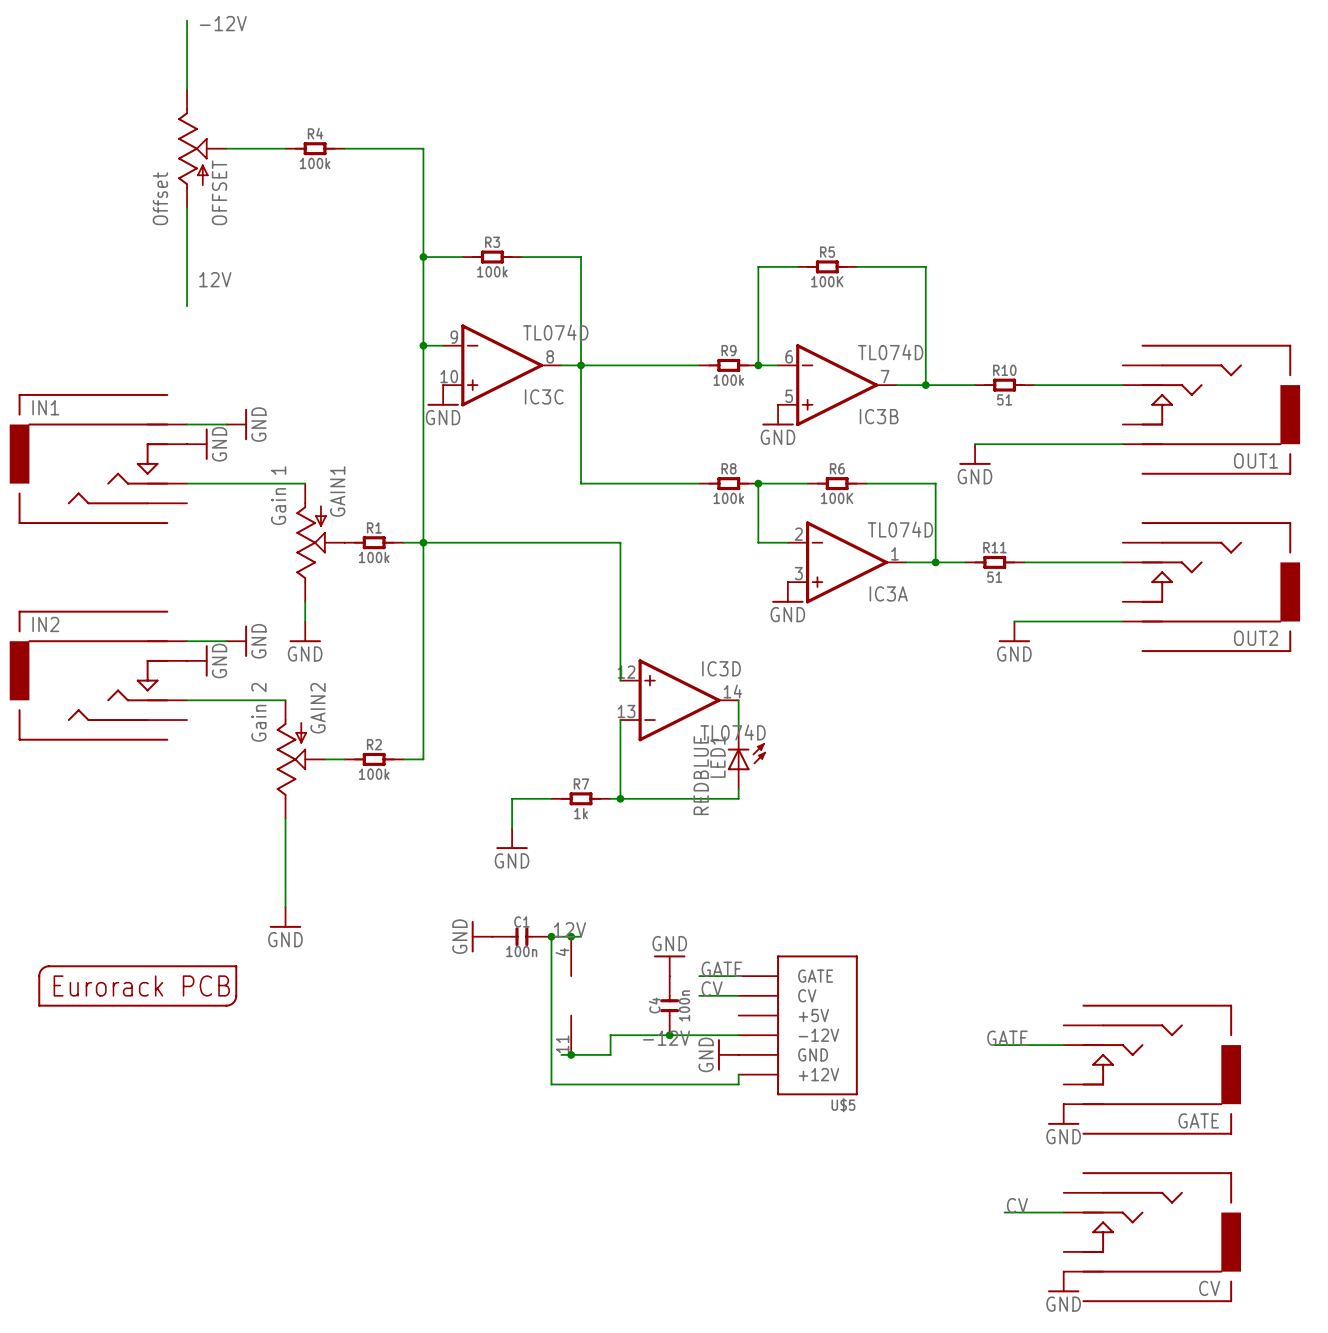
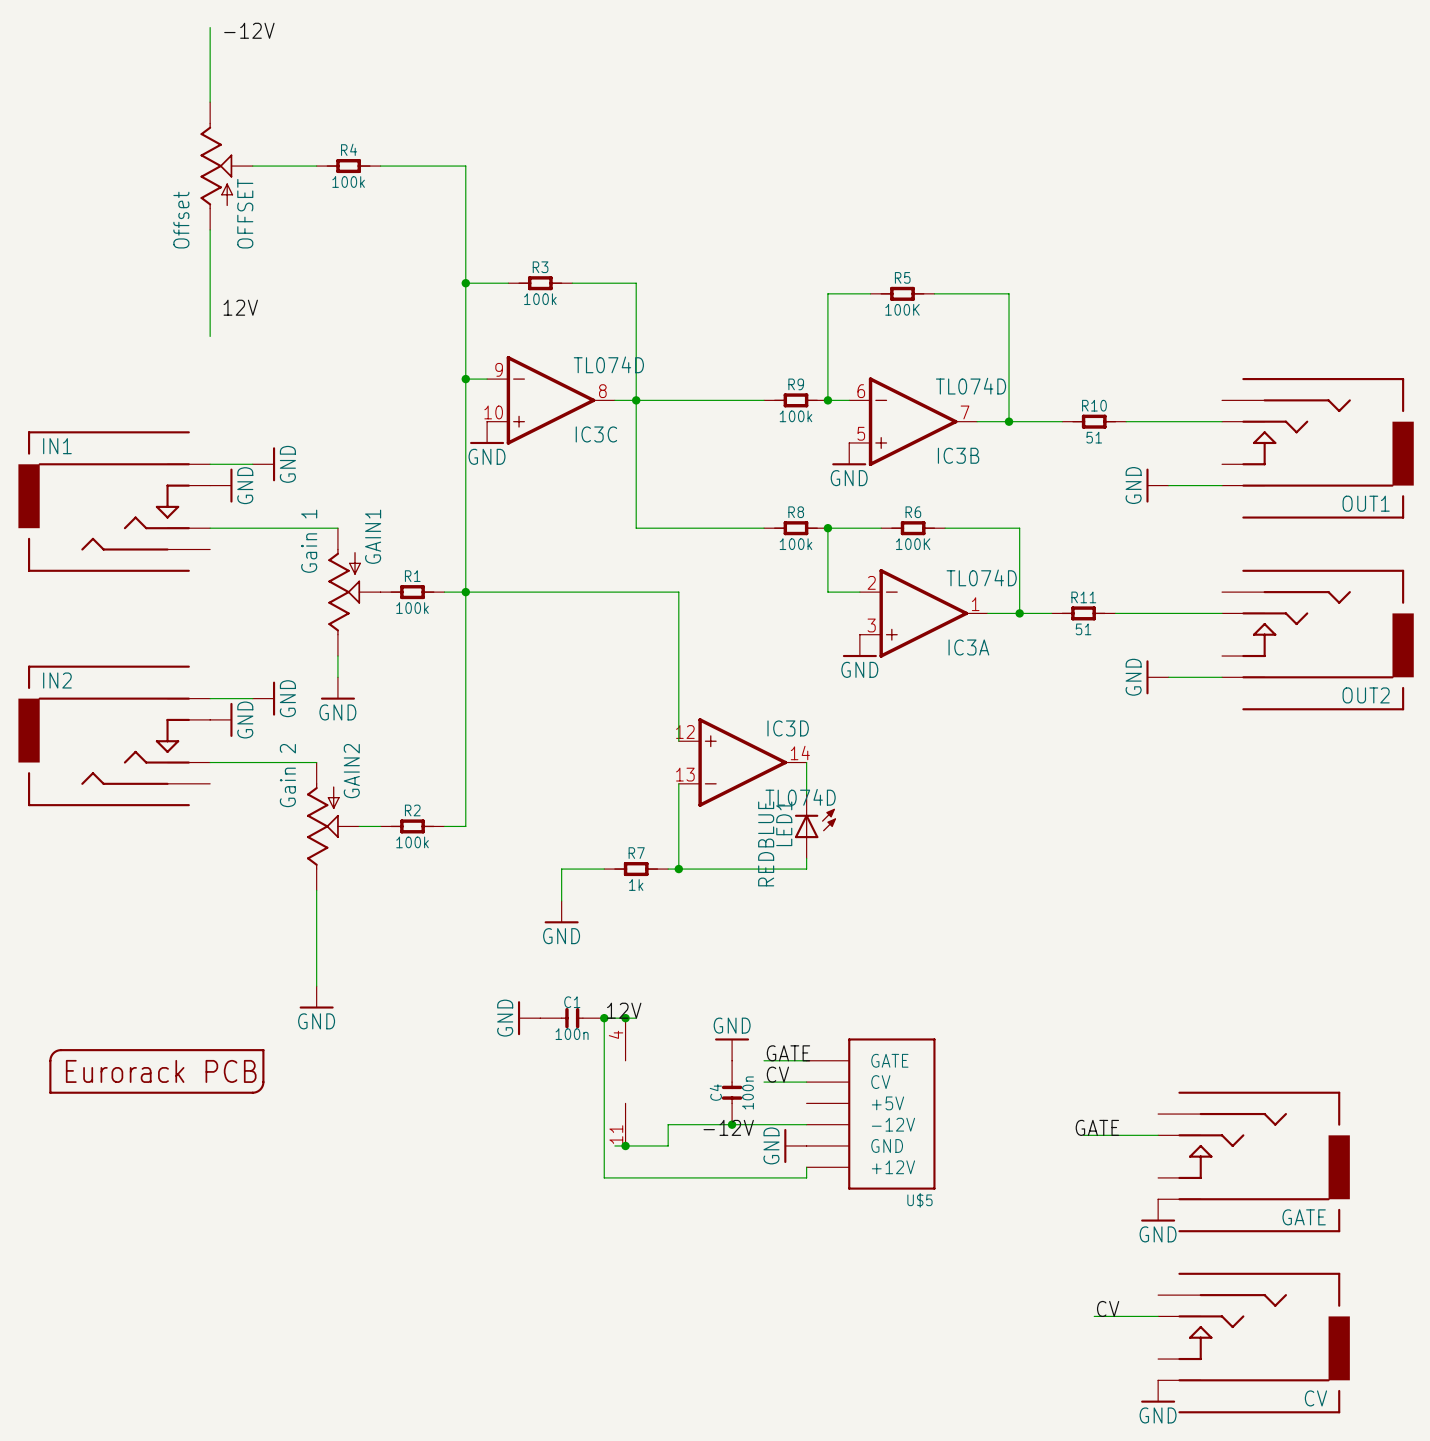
wire: (975, 444) (1073, 444) -> none
power symbol position: GND (975, 454) -> GND (1157, 485)
power symbol rotation: 0° (975, 463) -> 90° clockwise (1147, 485)
wire: (1014, 621) (1073, 621) -> none
power symbol position: GND (1014, 631) -> GND (1157, 677)
power symbol rotation: 0° (1014, 641) -> 90° clockwise (1147, 677)

